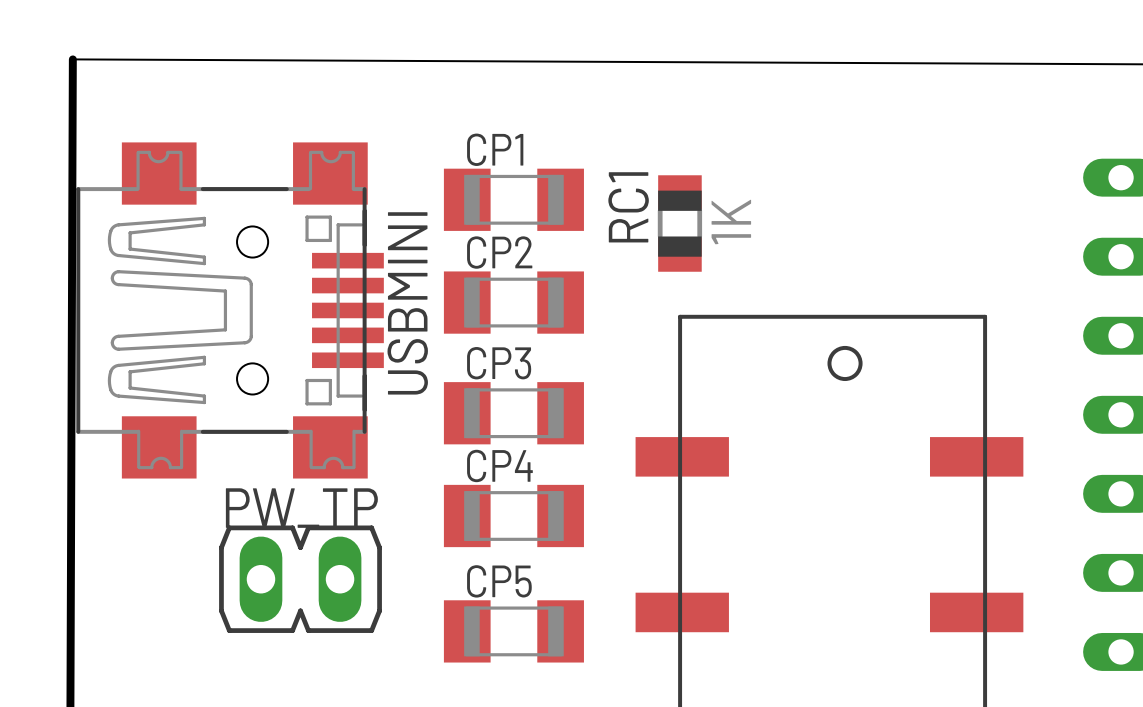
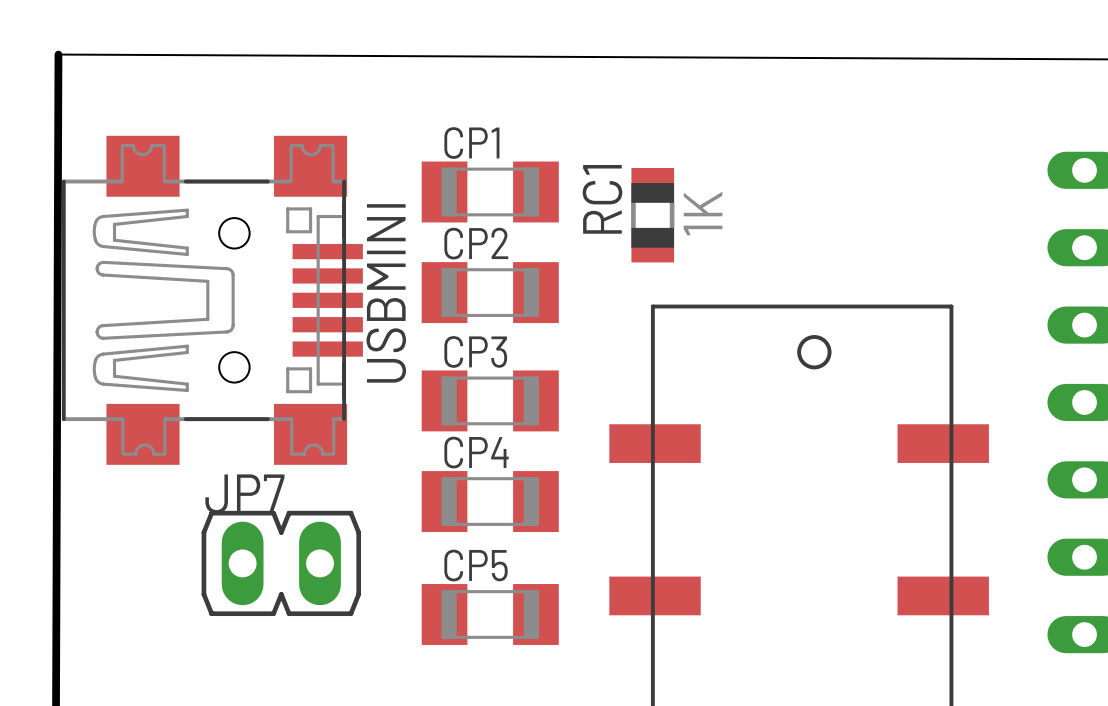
PW_TP name: PW_TP (301, 508) -> JP7 (244, 493)

